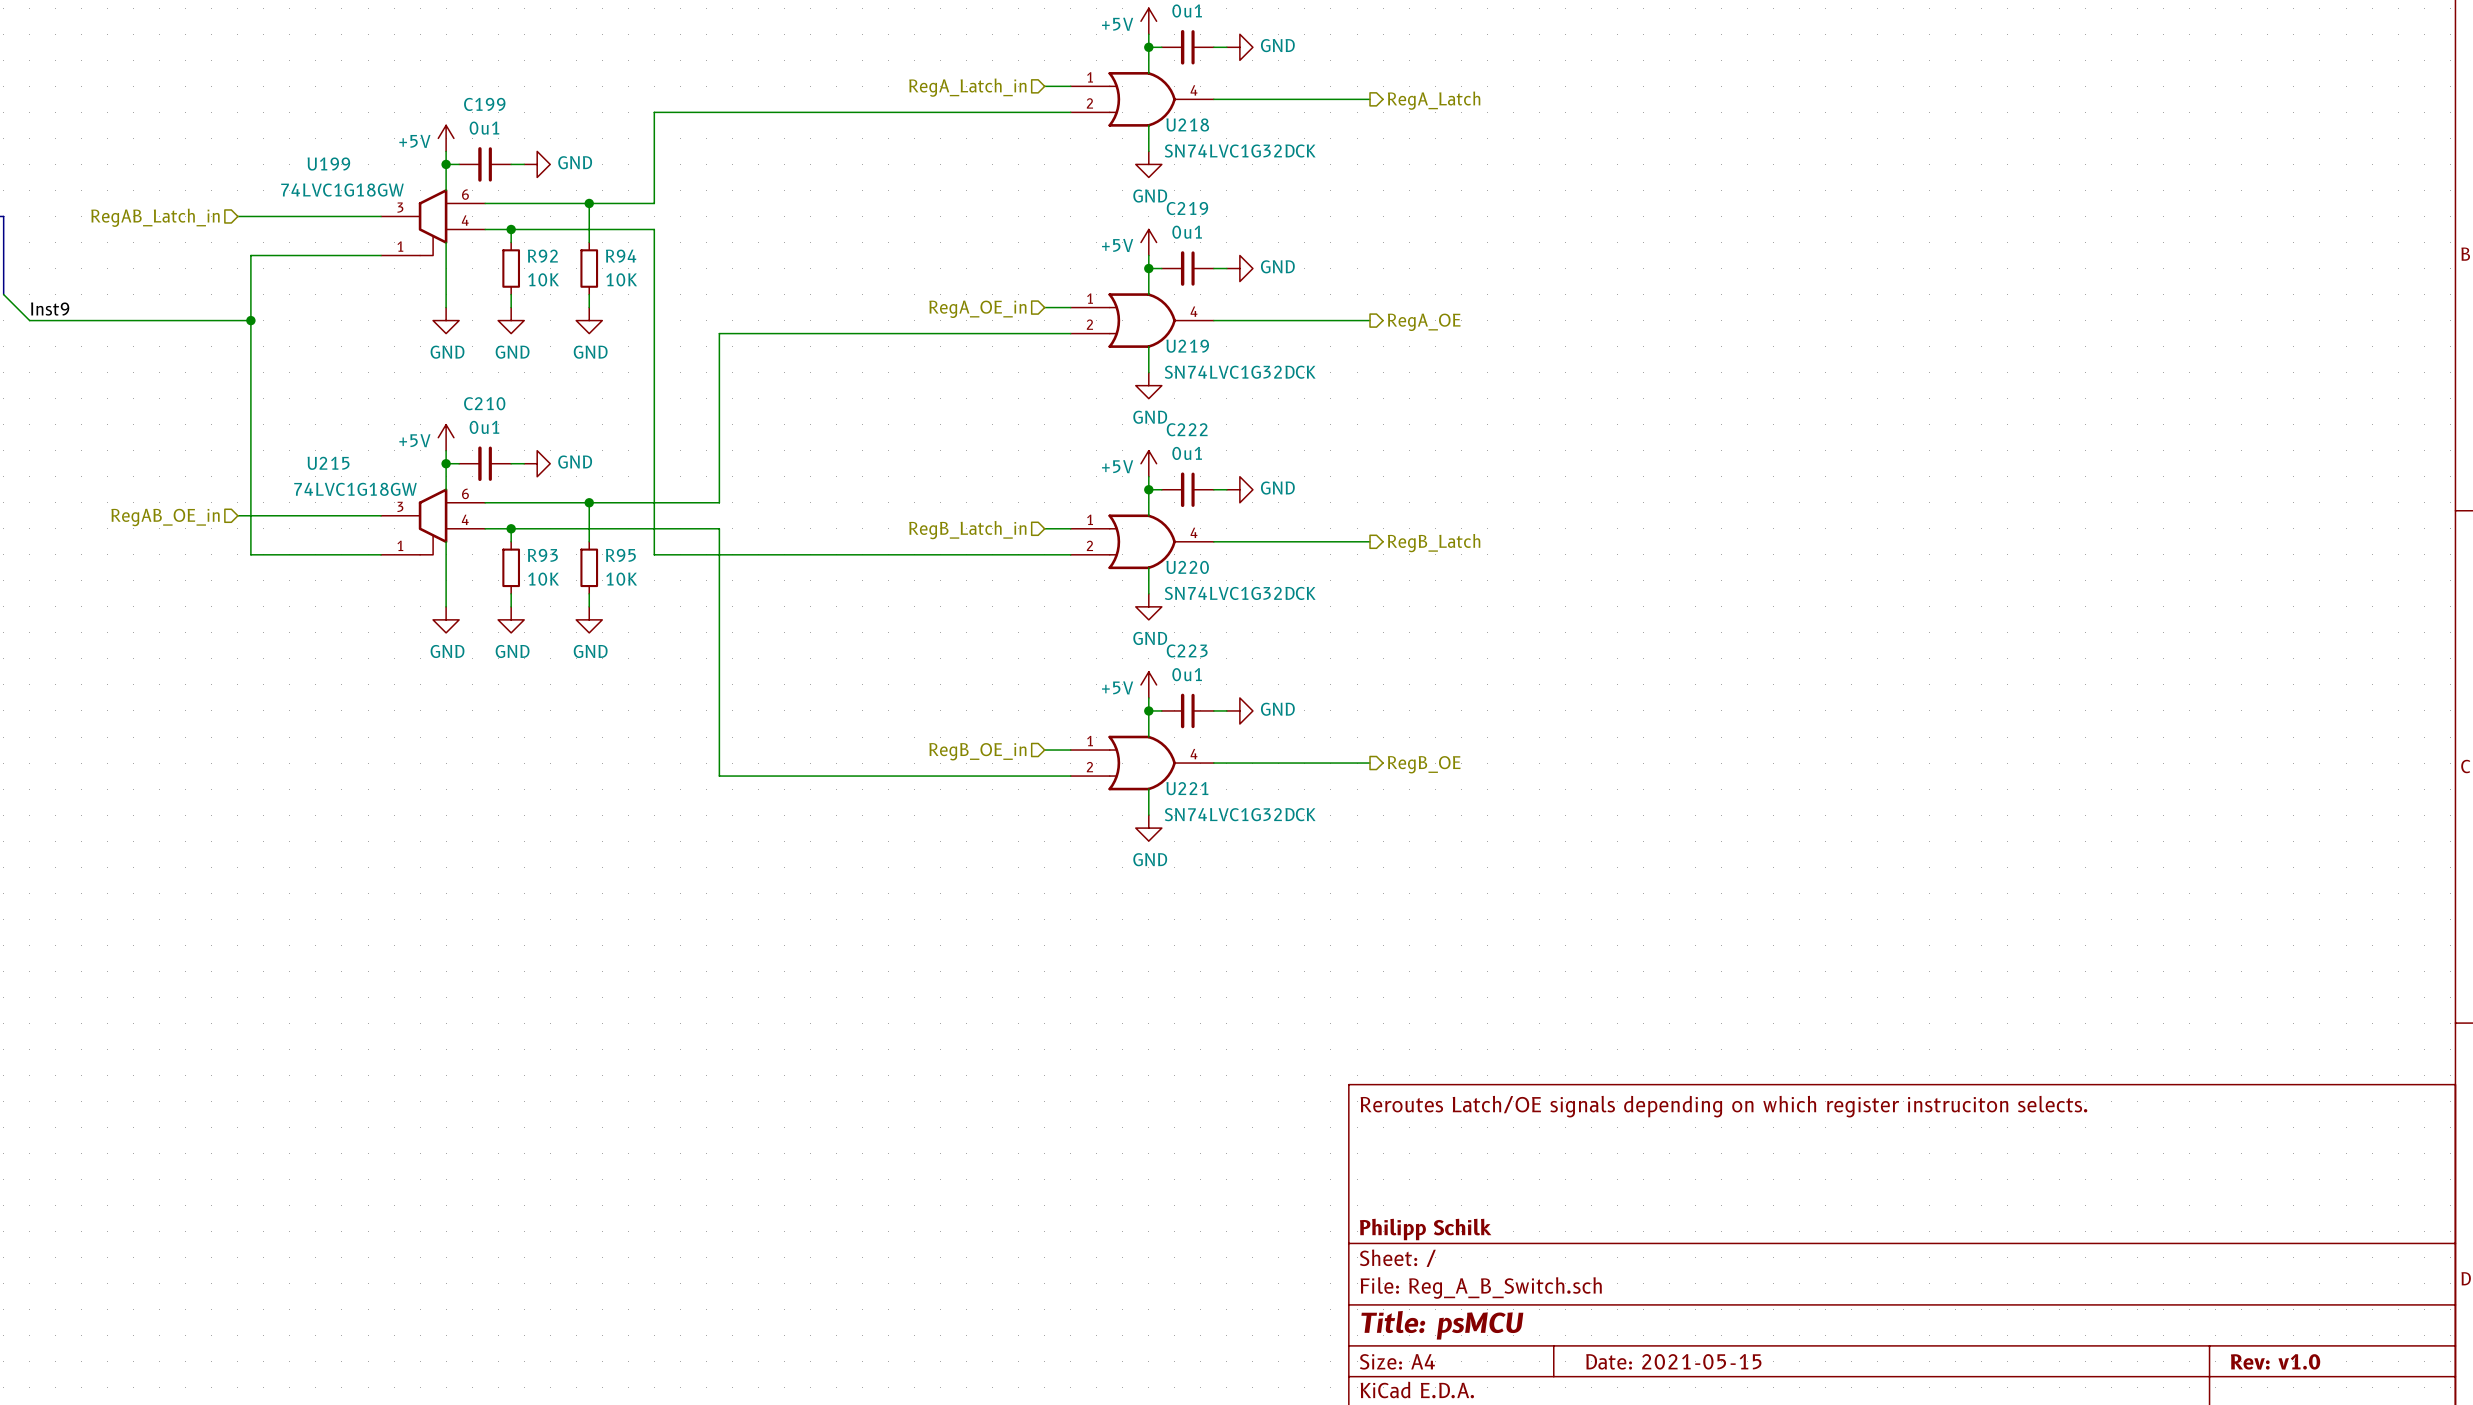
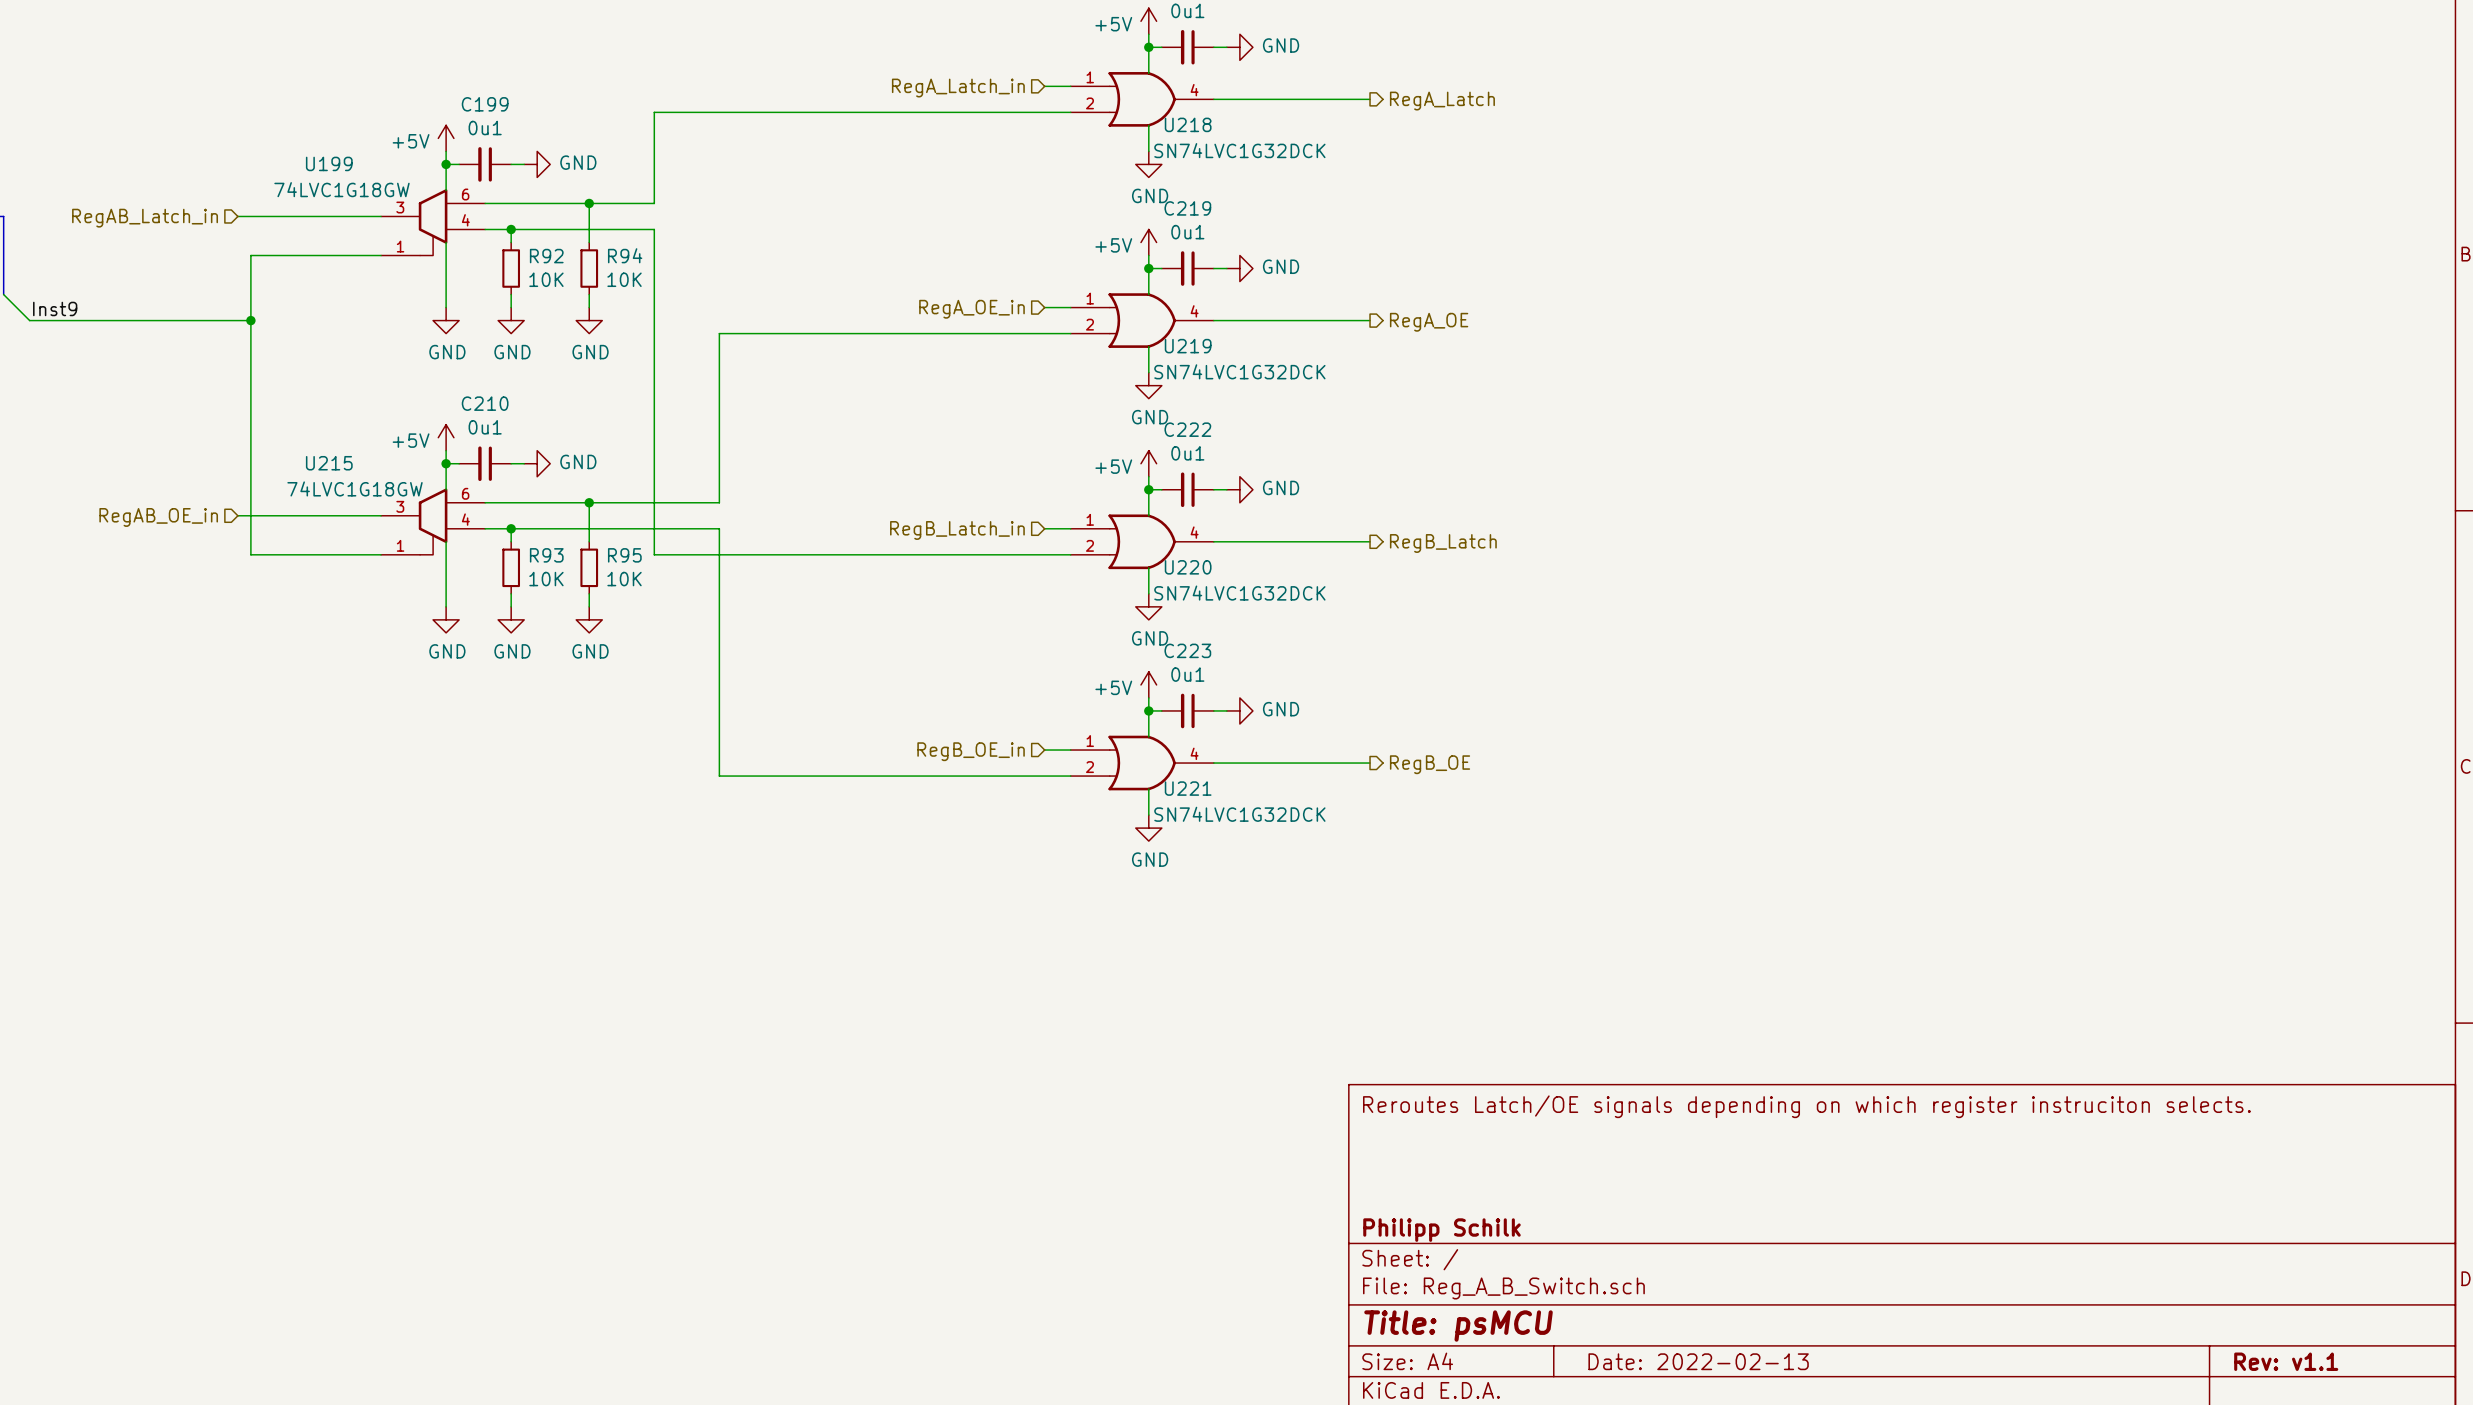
title block: Date: 2021-05-15 (1673, 1361) -> Date: 2022-02-13 (1698, 1361)
title block: Rev: v1.0 (2275, 1361) -> Rev: v1.1 (2286, 1361)

